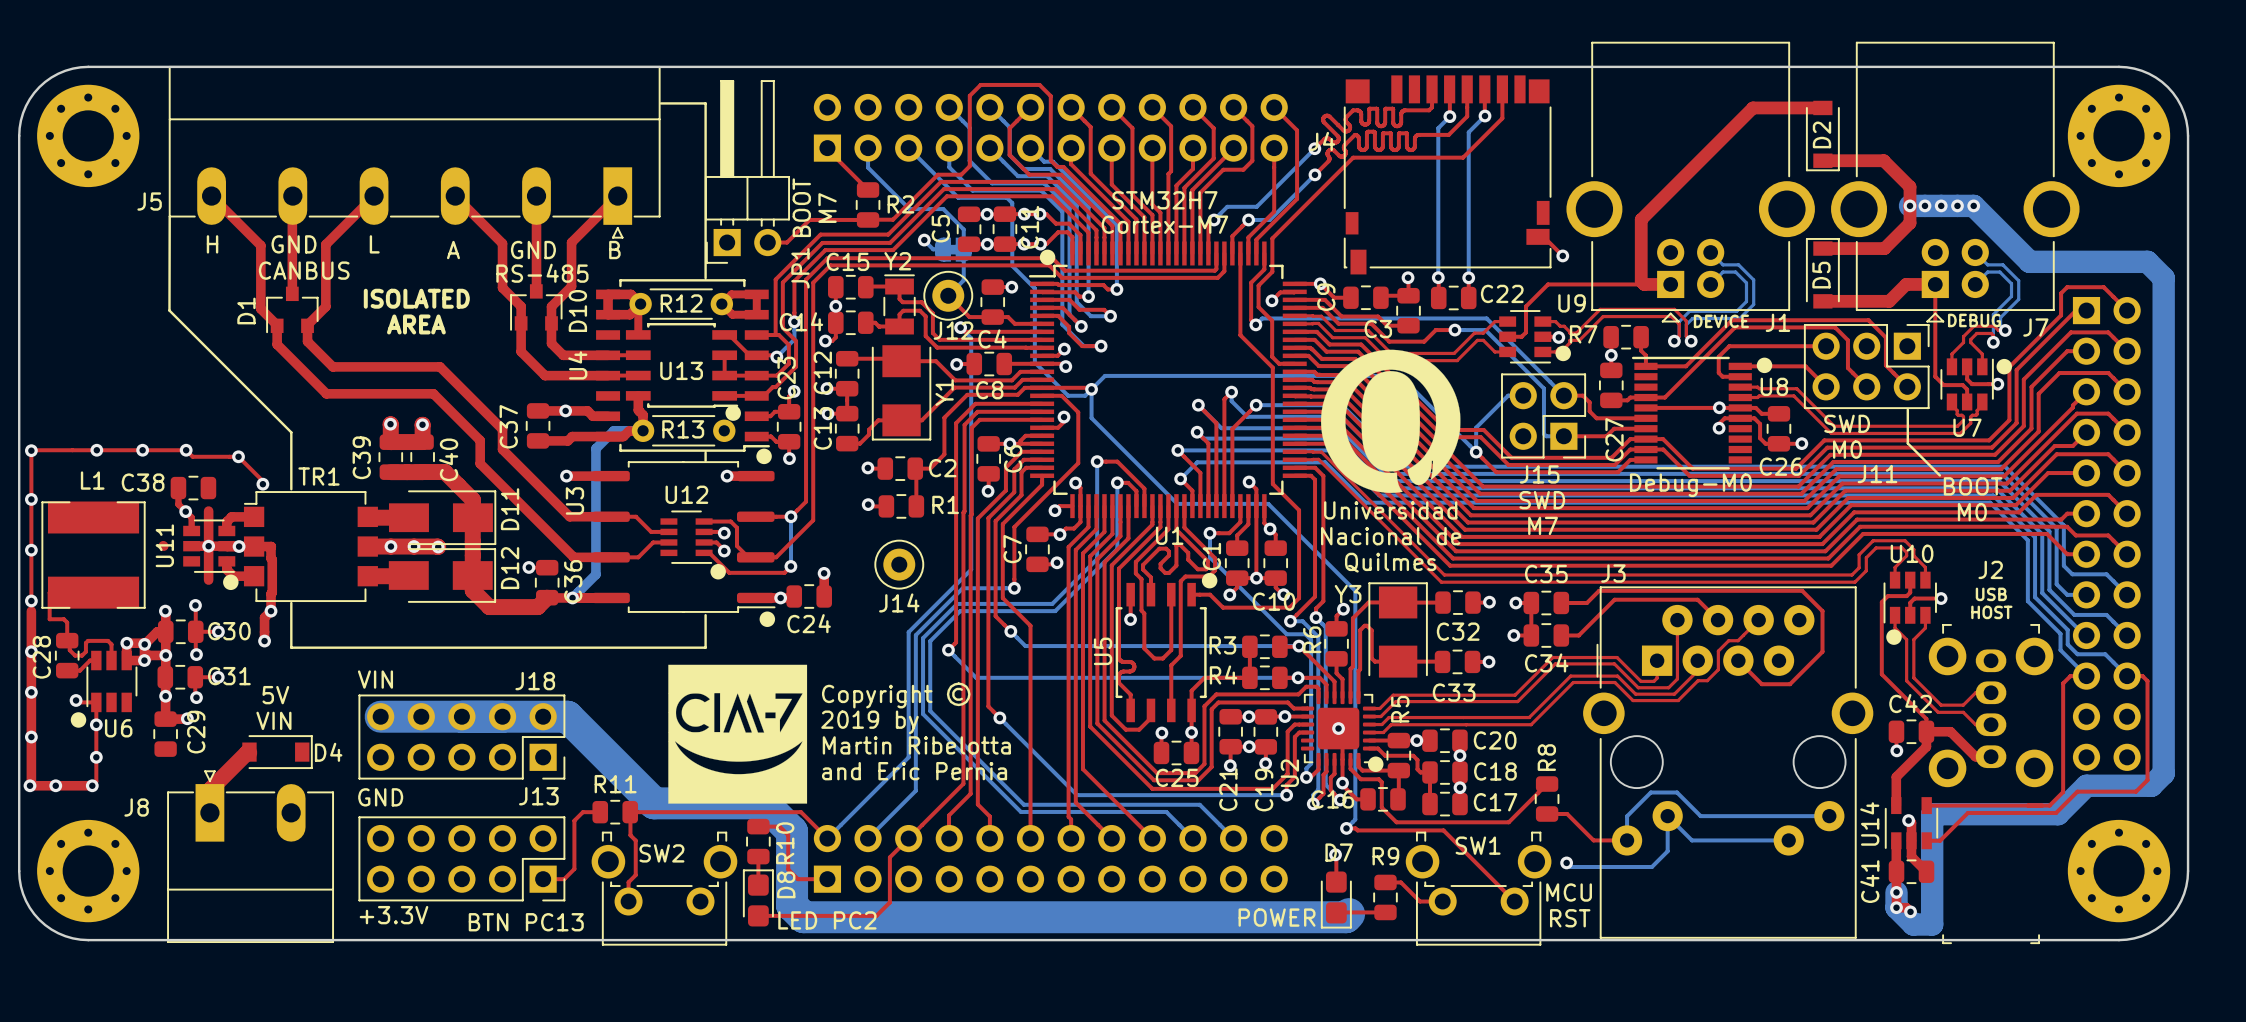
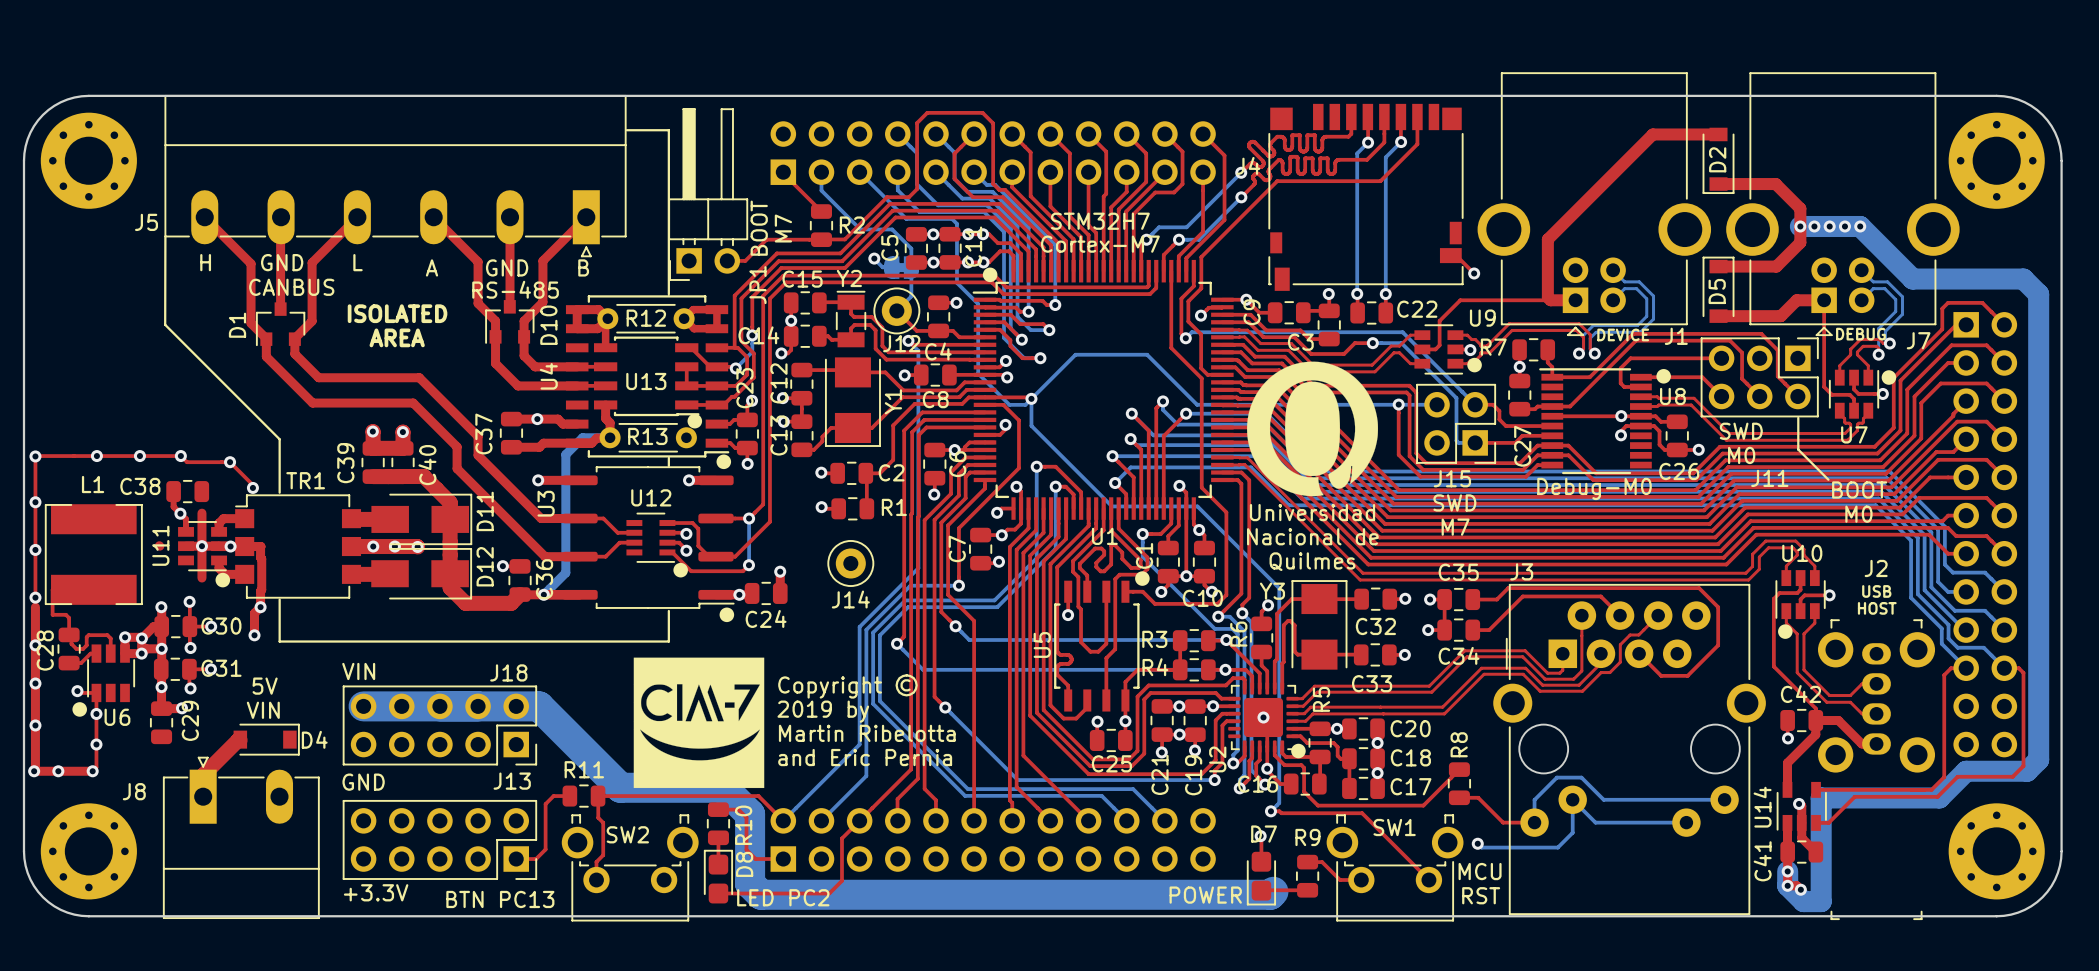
bottom track: (1105, 375) (1400, 375) (1476, 452) (1476, 427) (1508, 395) -> (1044, 386) (1075, 354) (1147, 354) (1197, 404) (1422, 404)
top track: (1392, 375) (1446, 429) (1483, 429) (1501, 447) -> (1313, 385) (1409, 385) (1416, 392) (1416, 453)
top track: (1389, 382) (1443, 437) (1480, 437) (1494, 450) -> (1310, 392) (1406, 392) (1409, 395) (1409, 456)
top track: (1476, 452) (1496, 472) (1505, 472) -> (1398, 404) (1398, 454) (1420, 476)
via position: (1476, 452) -> (1398, 404)

